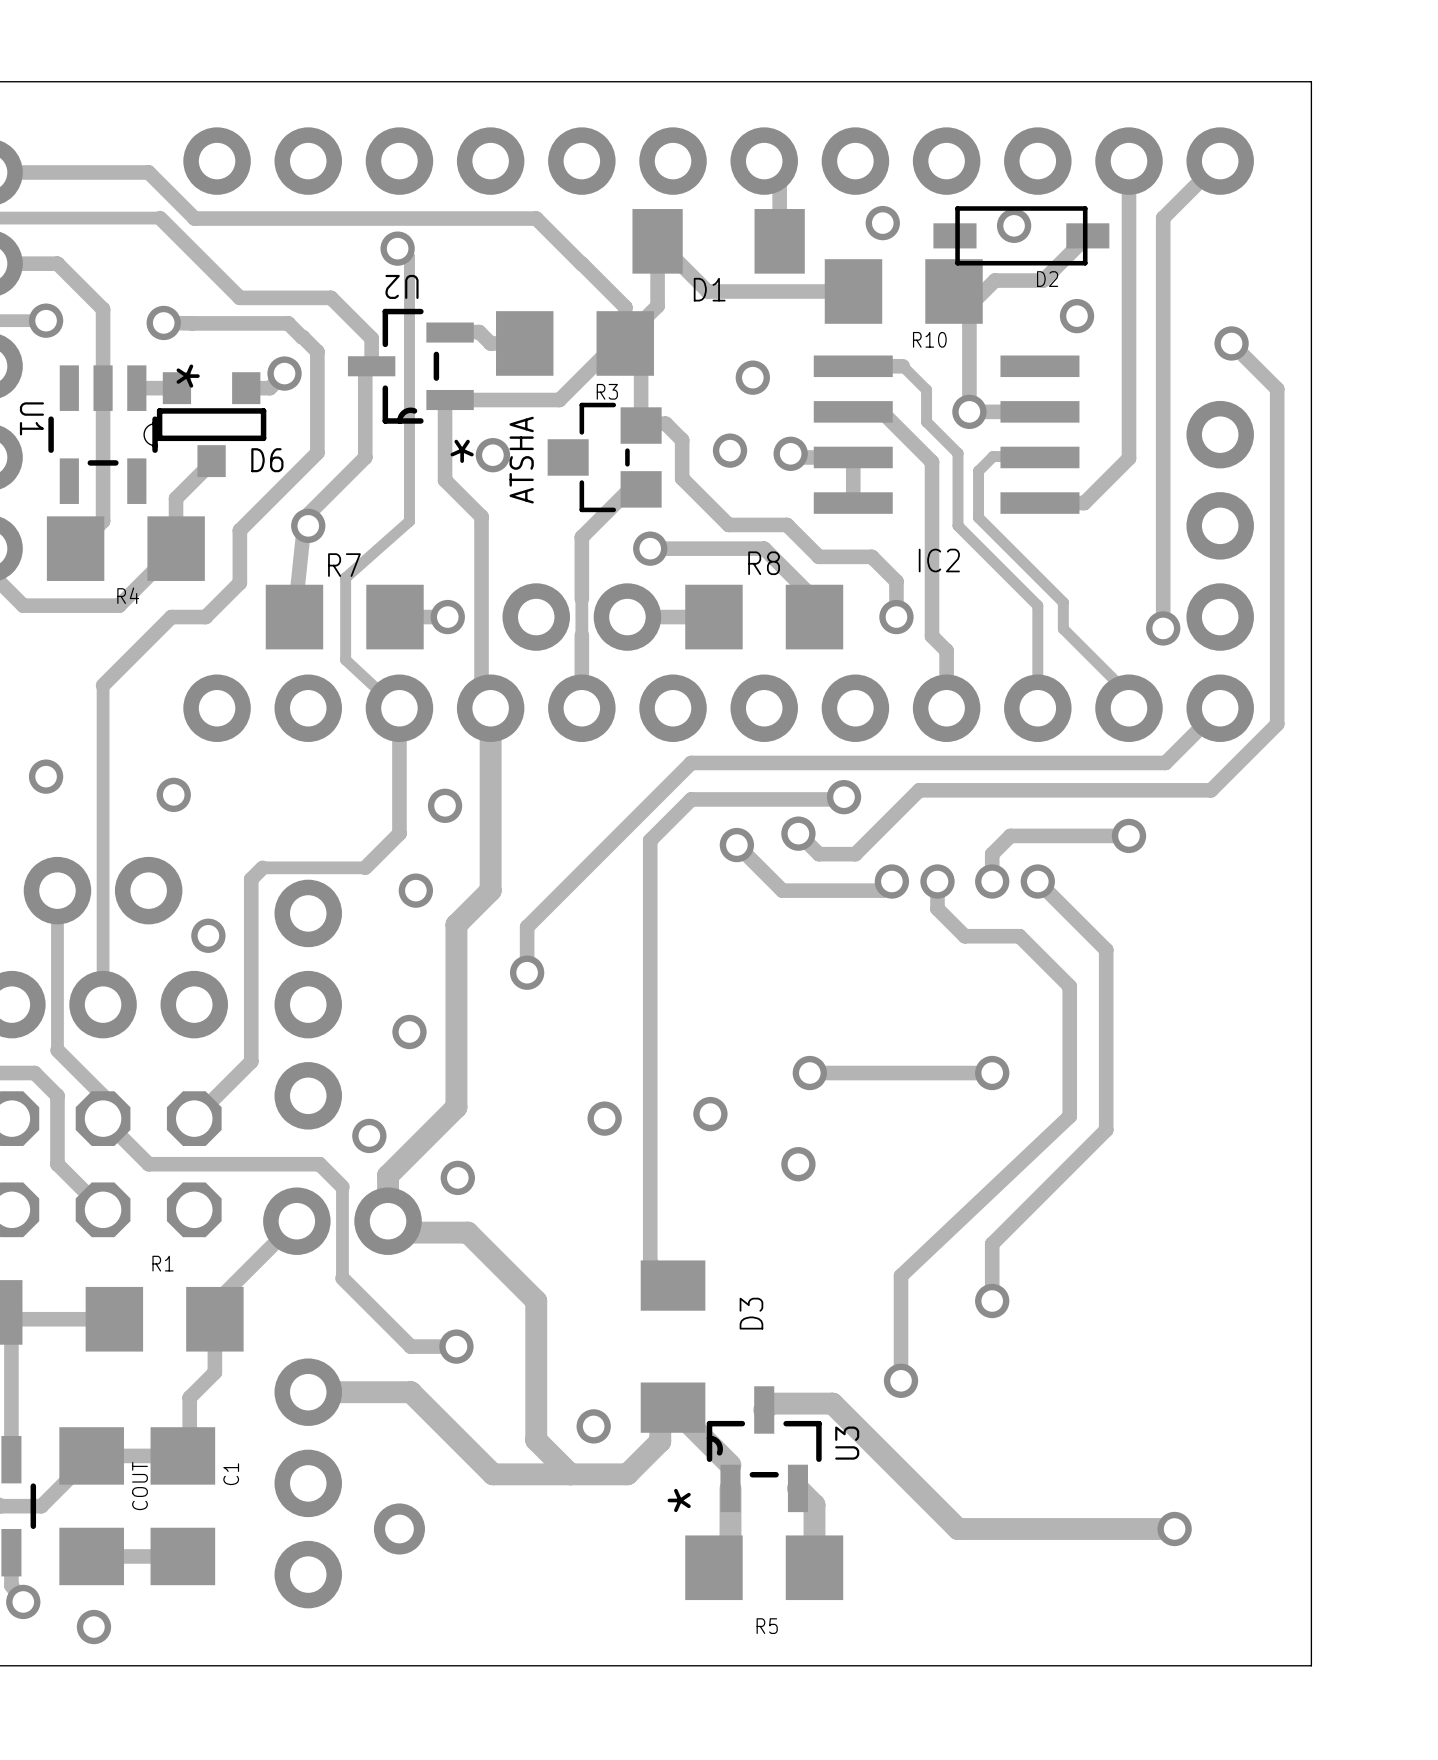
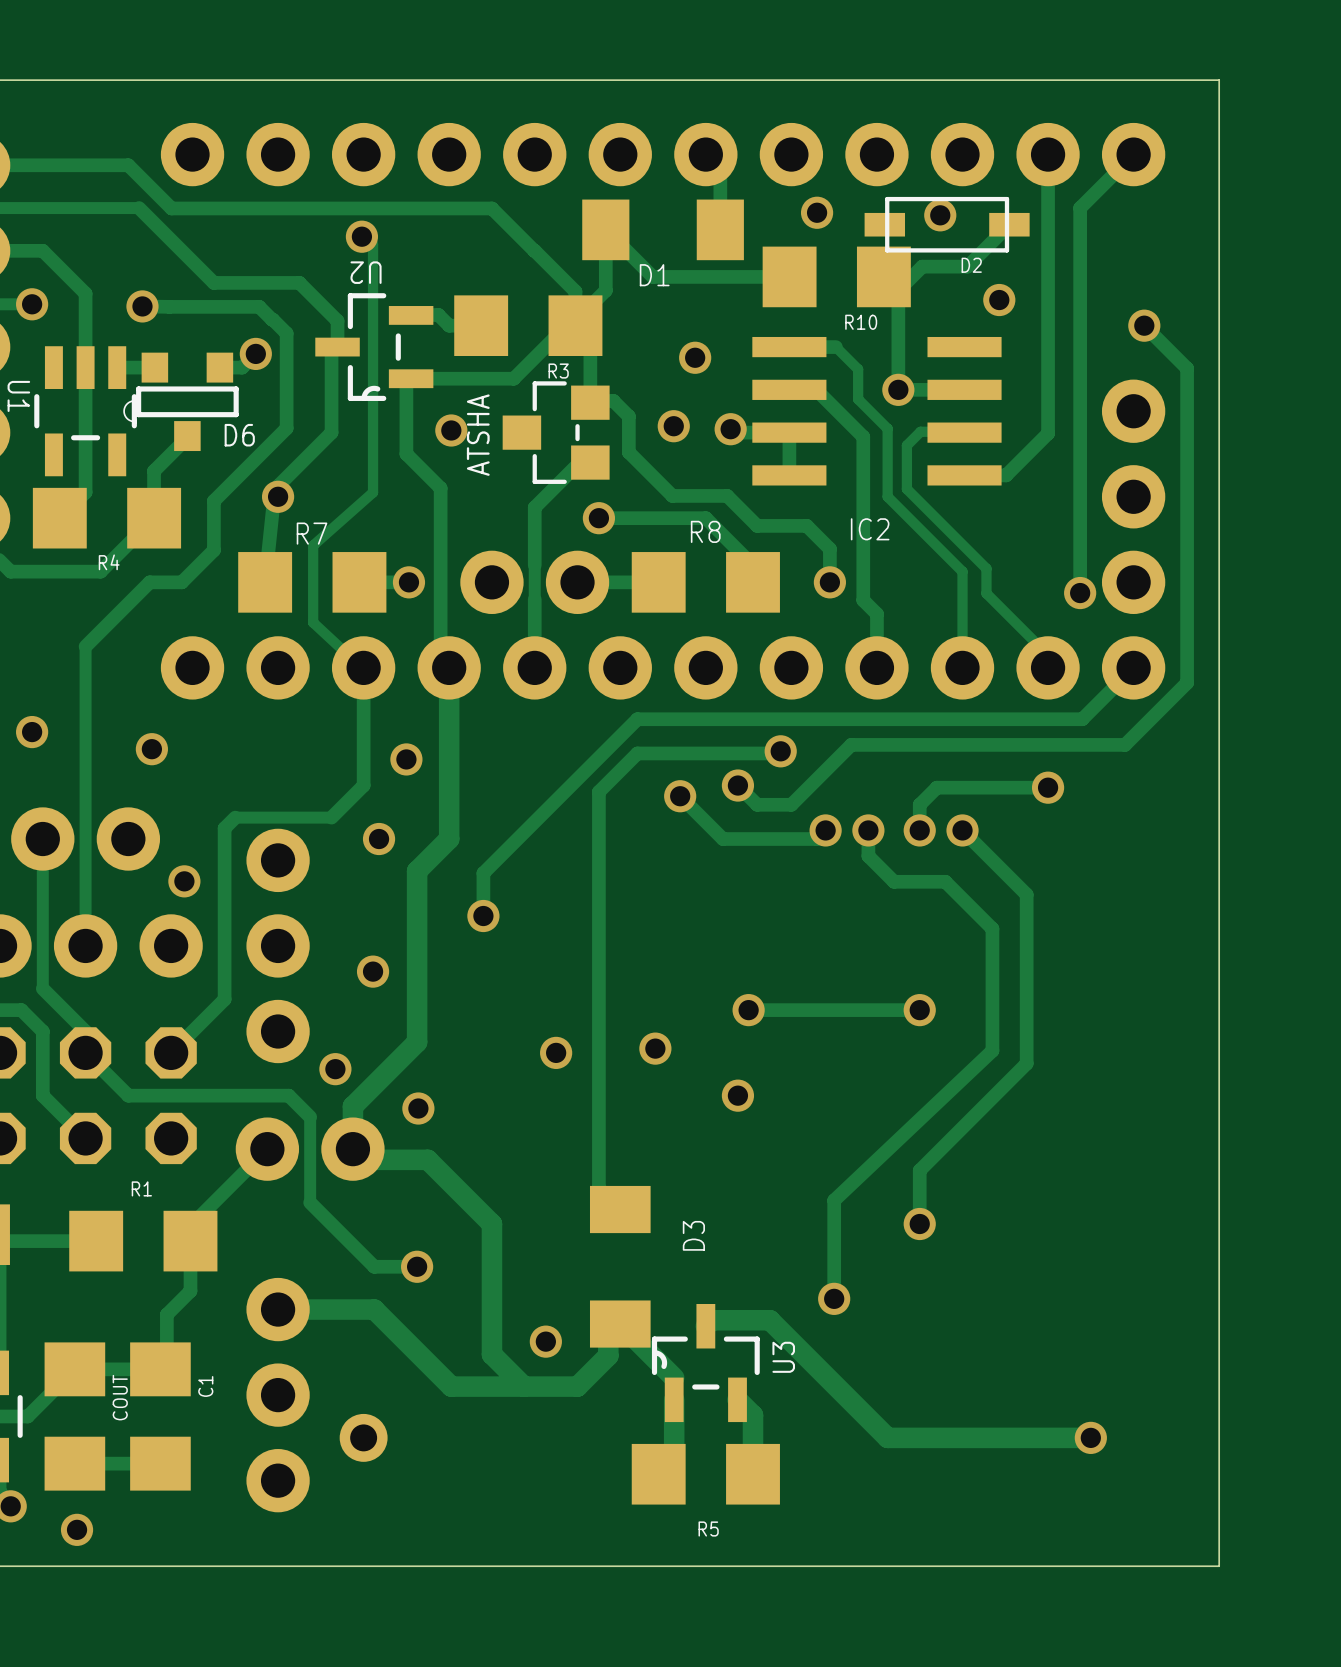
U1 text: * (188, 376) -> none
U2 text: * (462, 451) -> none
U3 text: * (679, 1500) -> none

